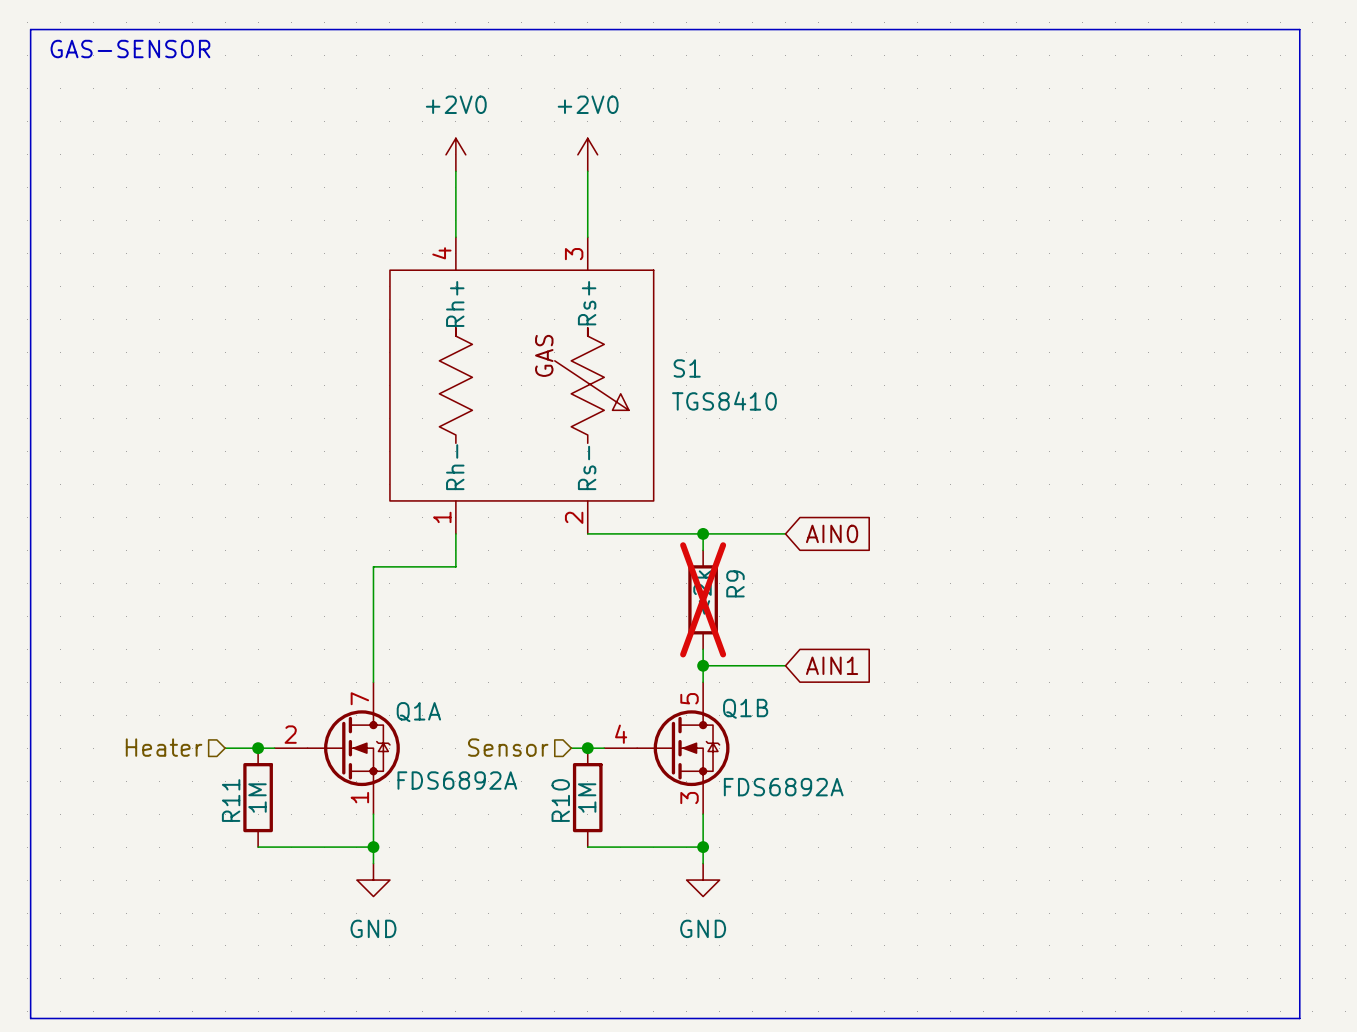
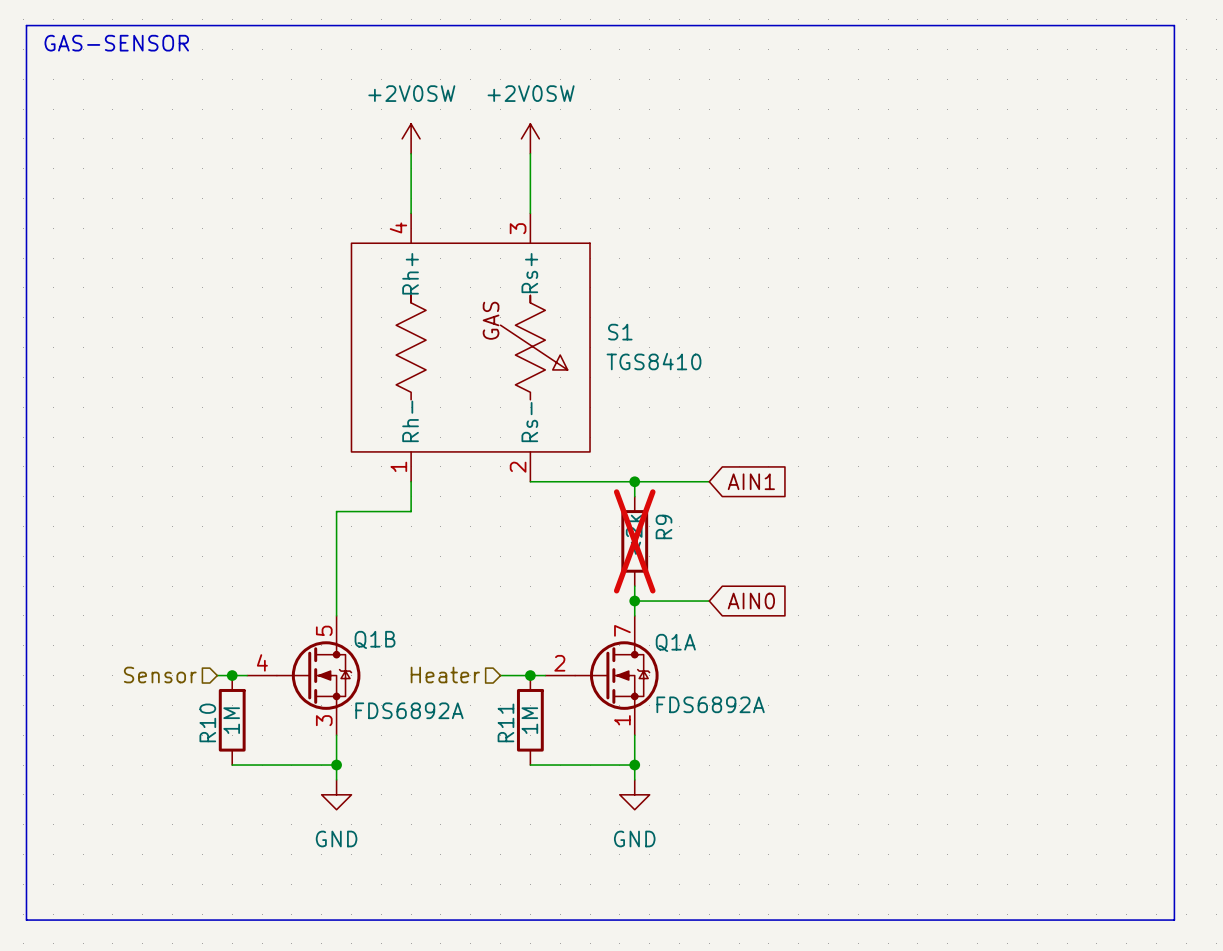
power symbol: +2V0 (455, 154) -> +2V0SW (411, 138)
power symbol: +2V0 (587, 154) -> +2V0SW (530, 138)
global label: AIN0 (832, 533) -> AIN1 (751, 481)
global label: AIN1 (832, 665) -> AIN0 (751, 601)
hierarchical label: Heater (164, 747) -> none
hierarchical label: none -> Sensor (160, 675)
hierarchical label: none -> Heater (445, 675)
hierarchical label: Sensor (508, 747) -> none
wire: (225, 748) (241, 748) -> none
Q1A position: (337, 748) -> (601, 675)
wire: none -> (500, 675) (515, 675)
Q1B position: (666, 748) -> (303, 675)
R11 name: R11 (231, 800) -> R10 (207, 722)
R10 name: R10 (560, 800) -> R11 (505, 722)

